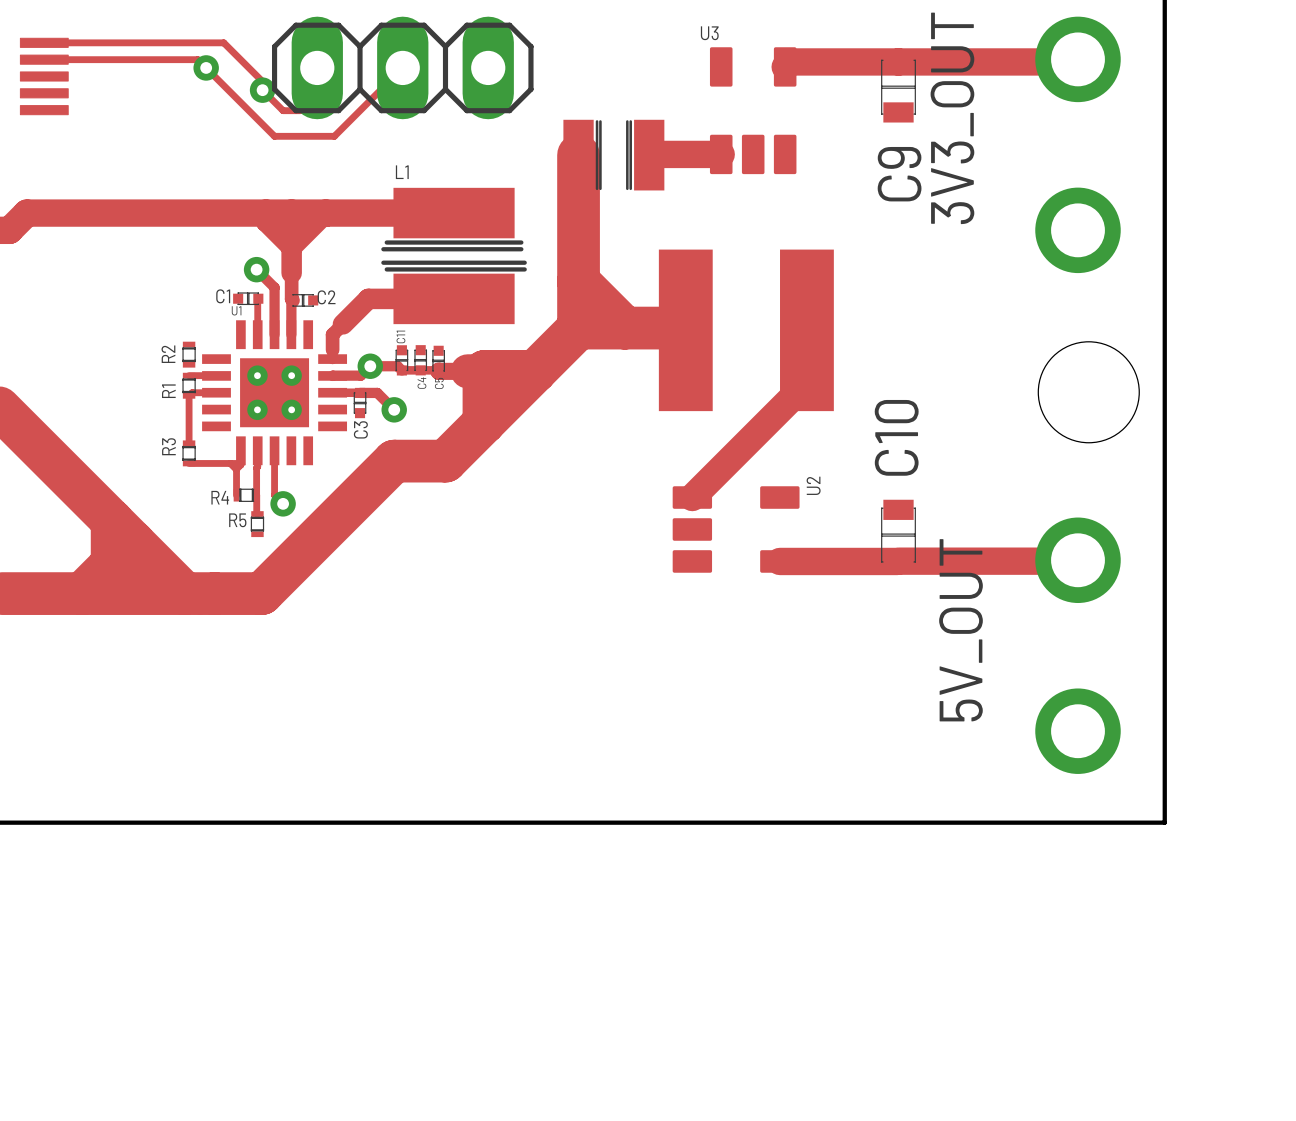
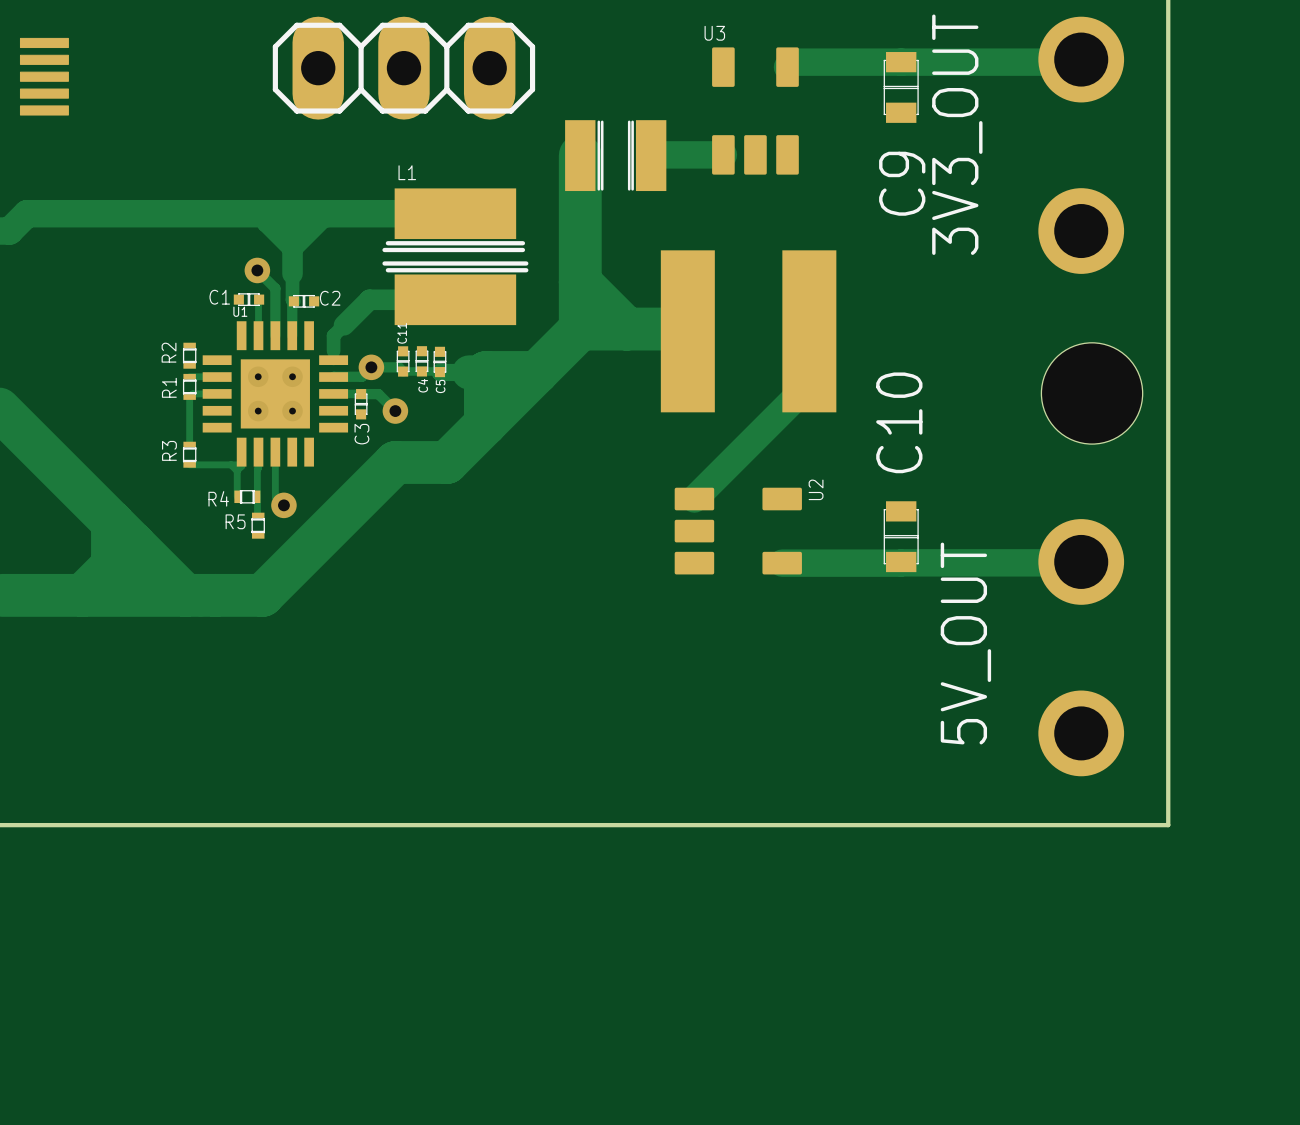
track: (44, 42) (223, 42) (262, 81) (262, 90) (283, 110) (300, 110) (317, 93) (317, 67) -> none
track: (44, 59) (197, 59) (274, 136) (334, 136) (402, 67) -> none
via: (206, 67) -> none
via: (262, 90) -> none

